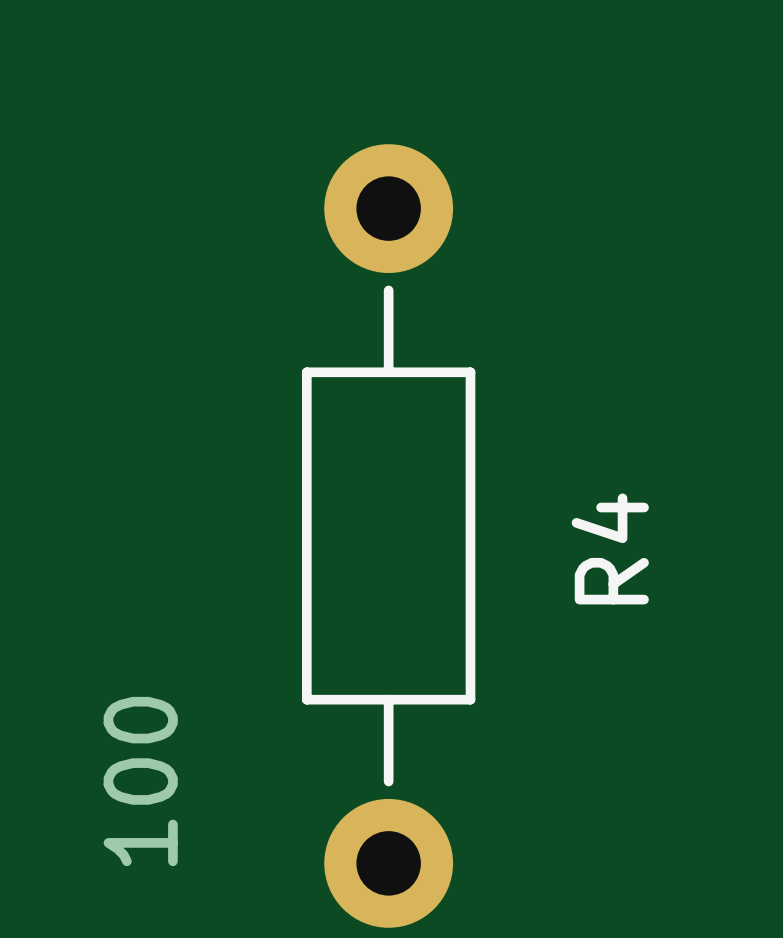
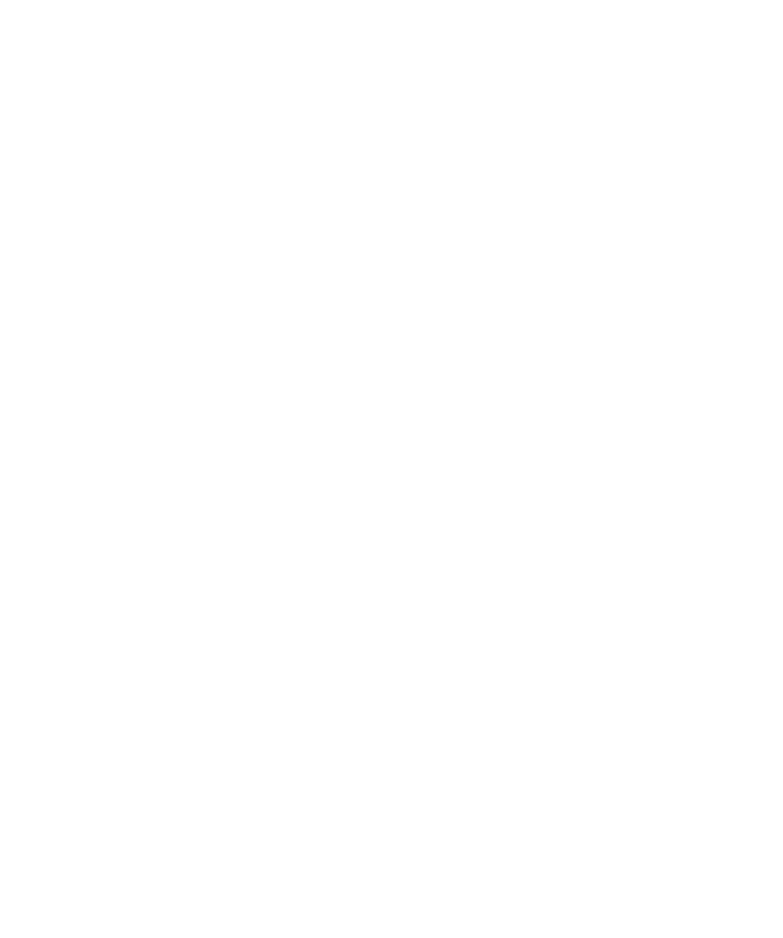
R4: 100 (388, 535) -> none

